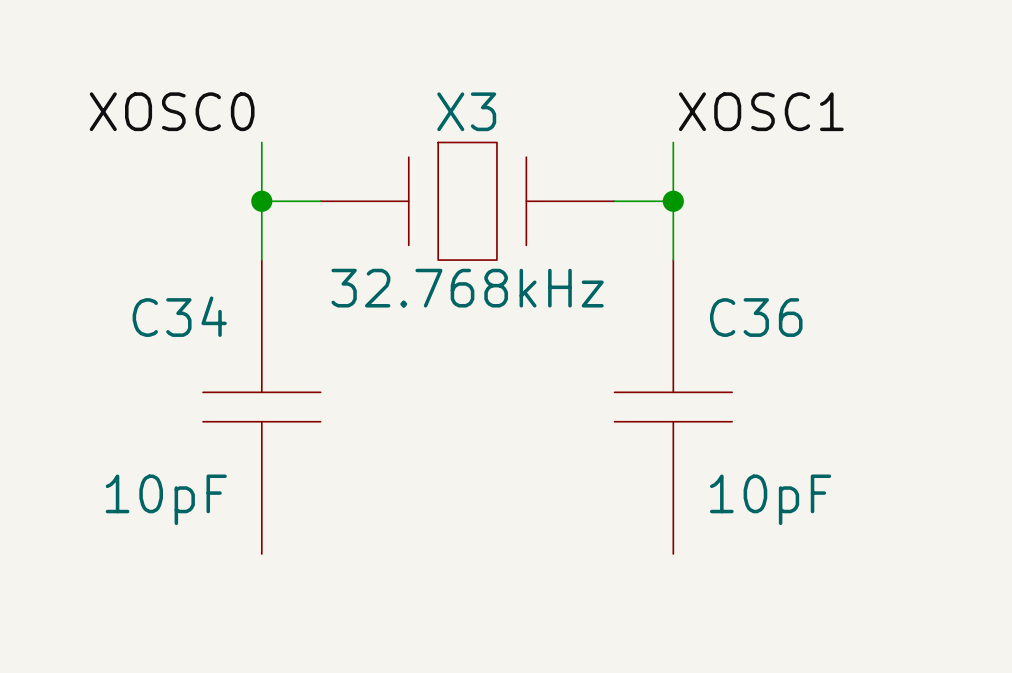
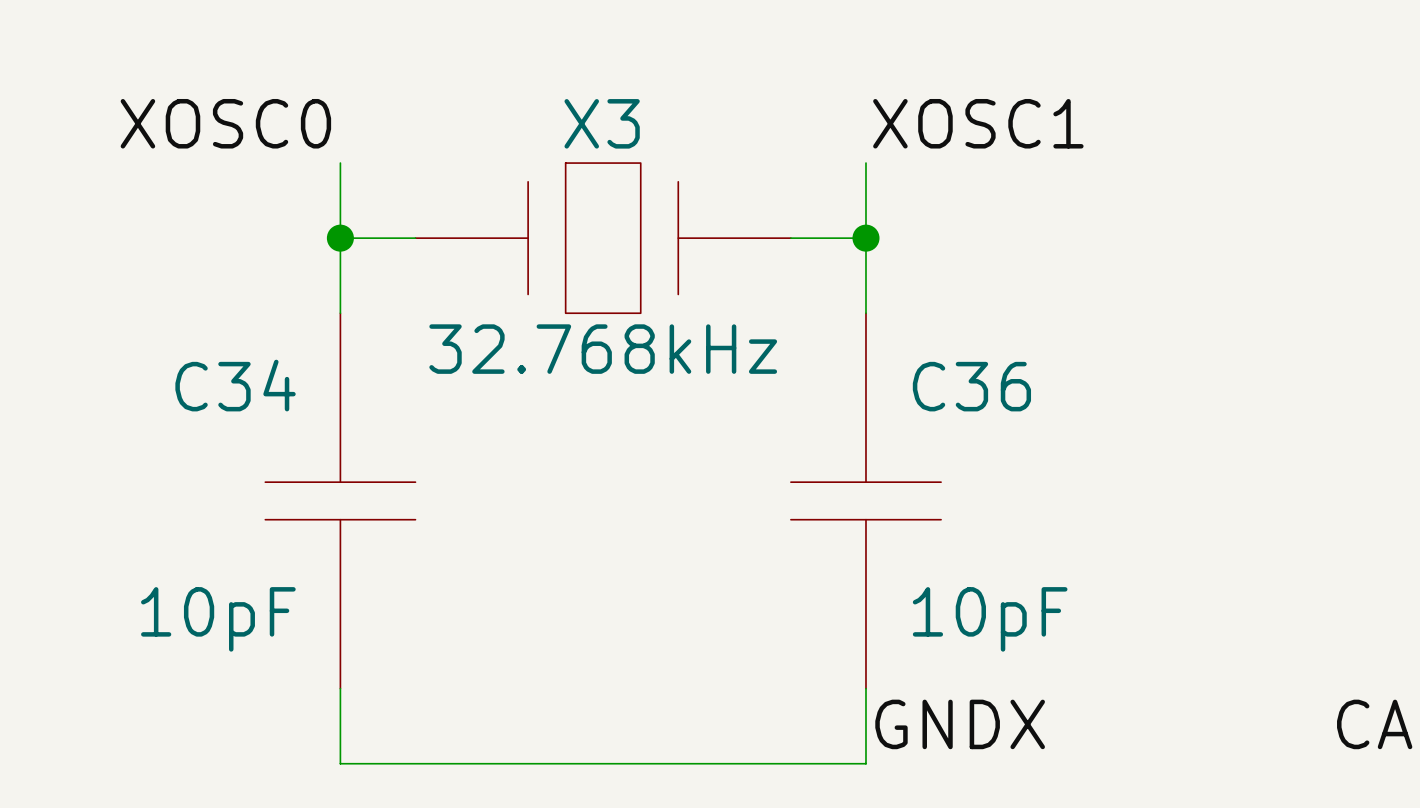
wire: none -> (340, 688) (340, 763) (865, 763) (865, 688)
label: none -> GNDX (960, 724)

